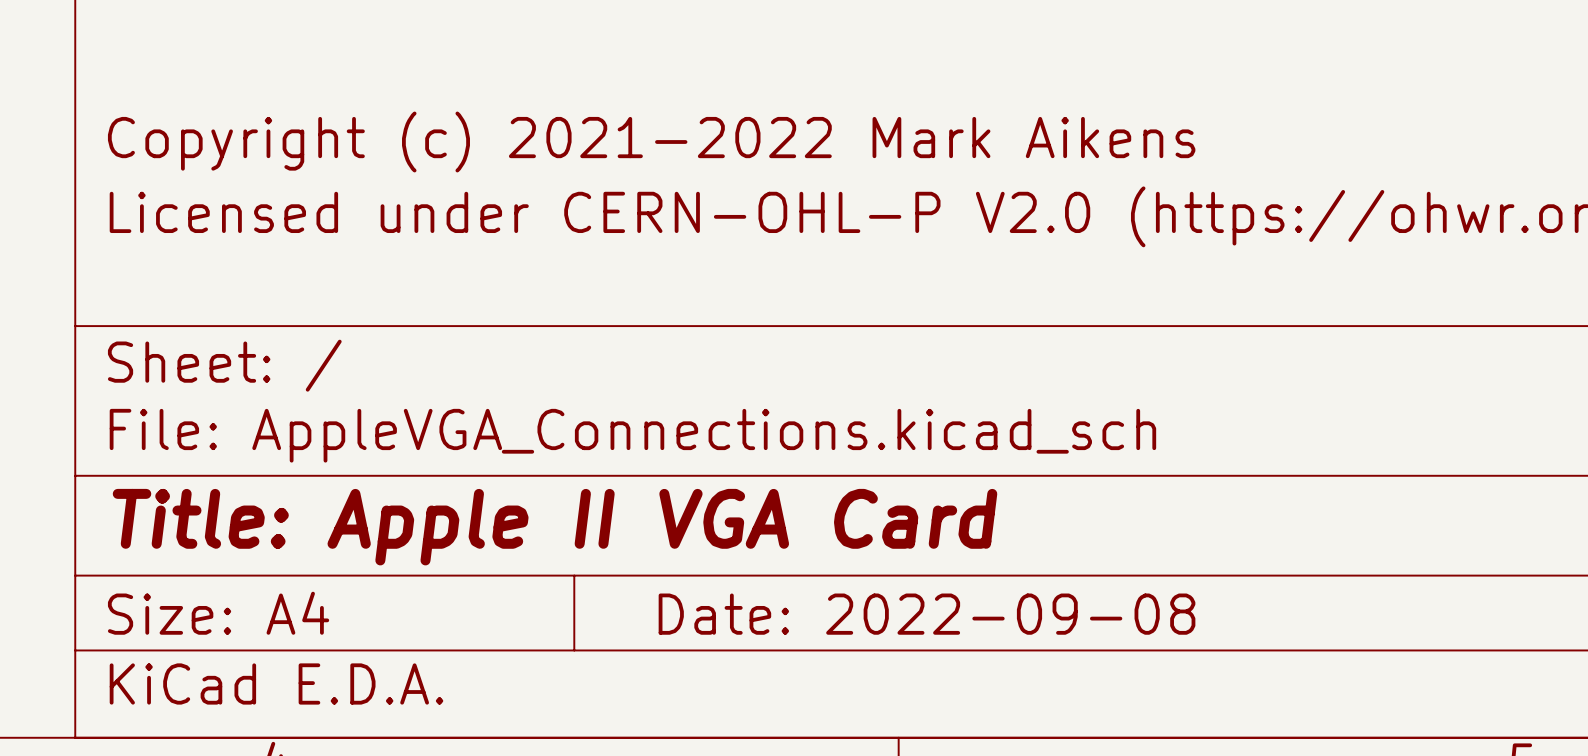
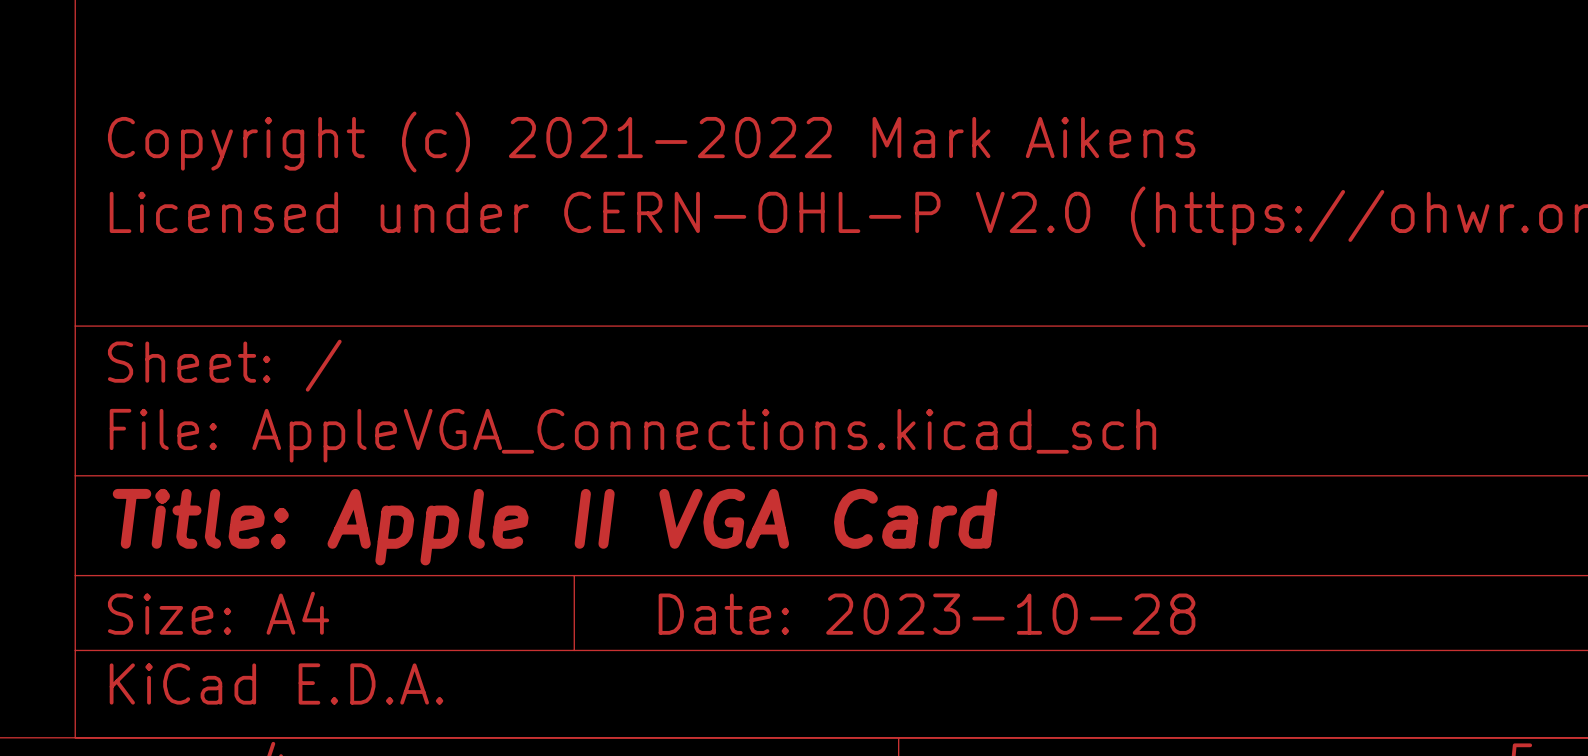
title block: Date: 2022-09-08 (927, 614) -> Date: 2023-10-28 (927, 614)

